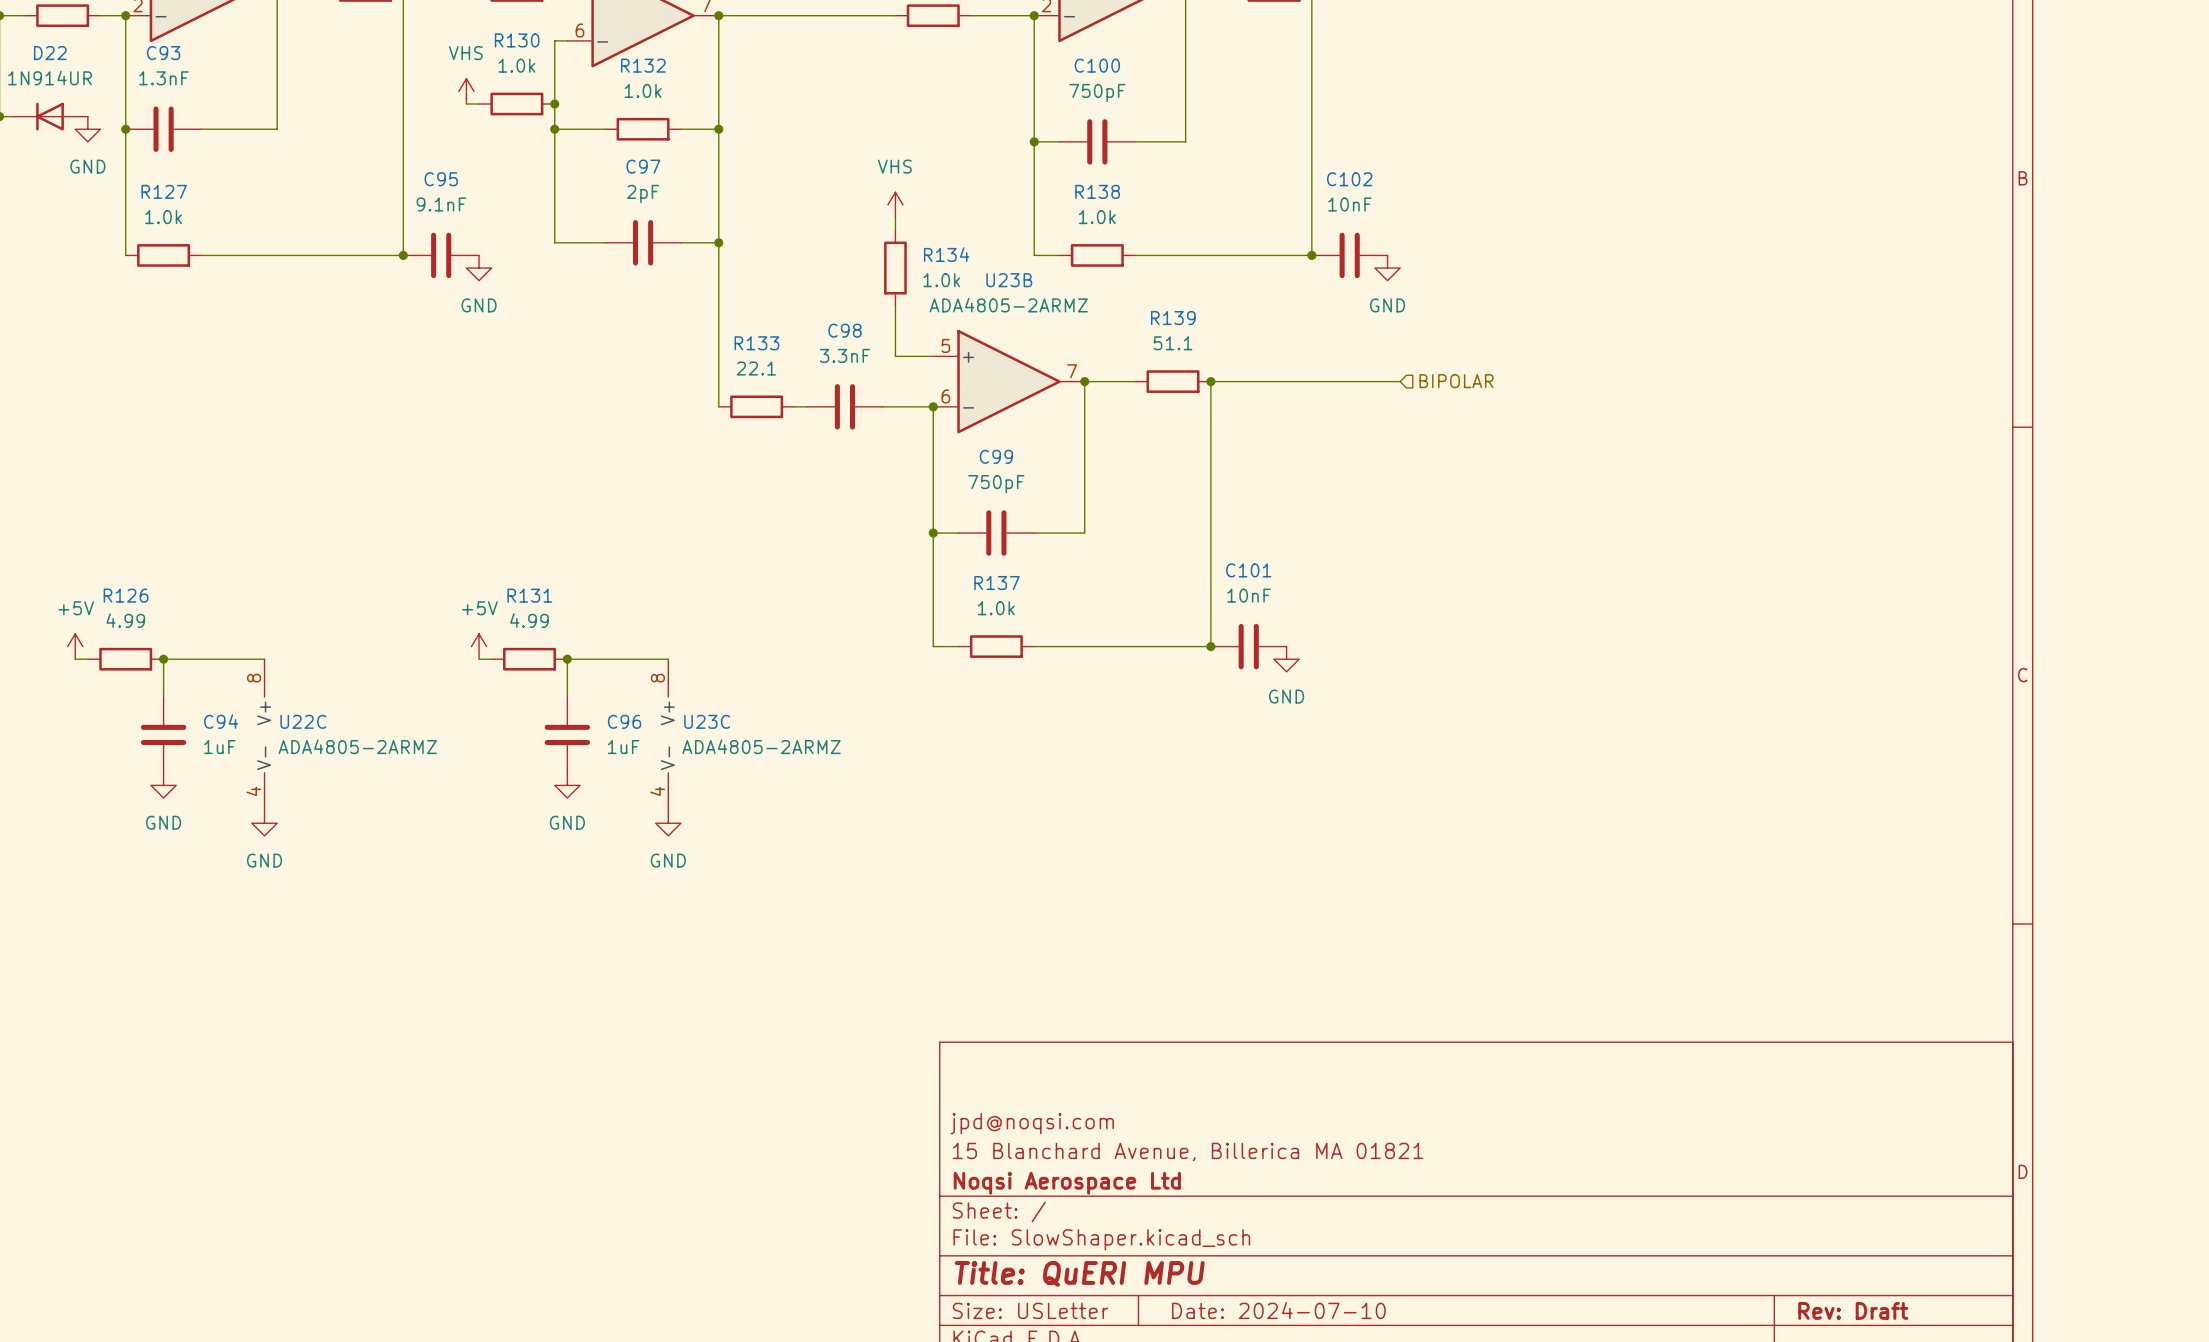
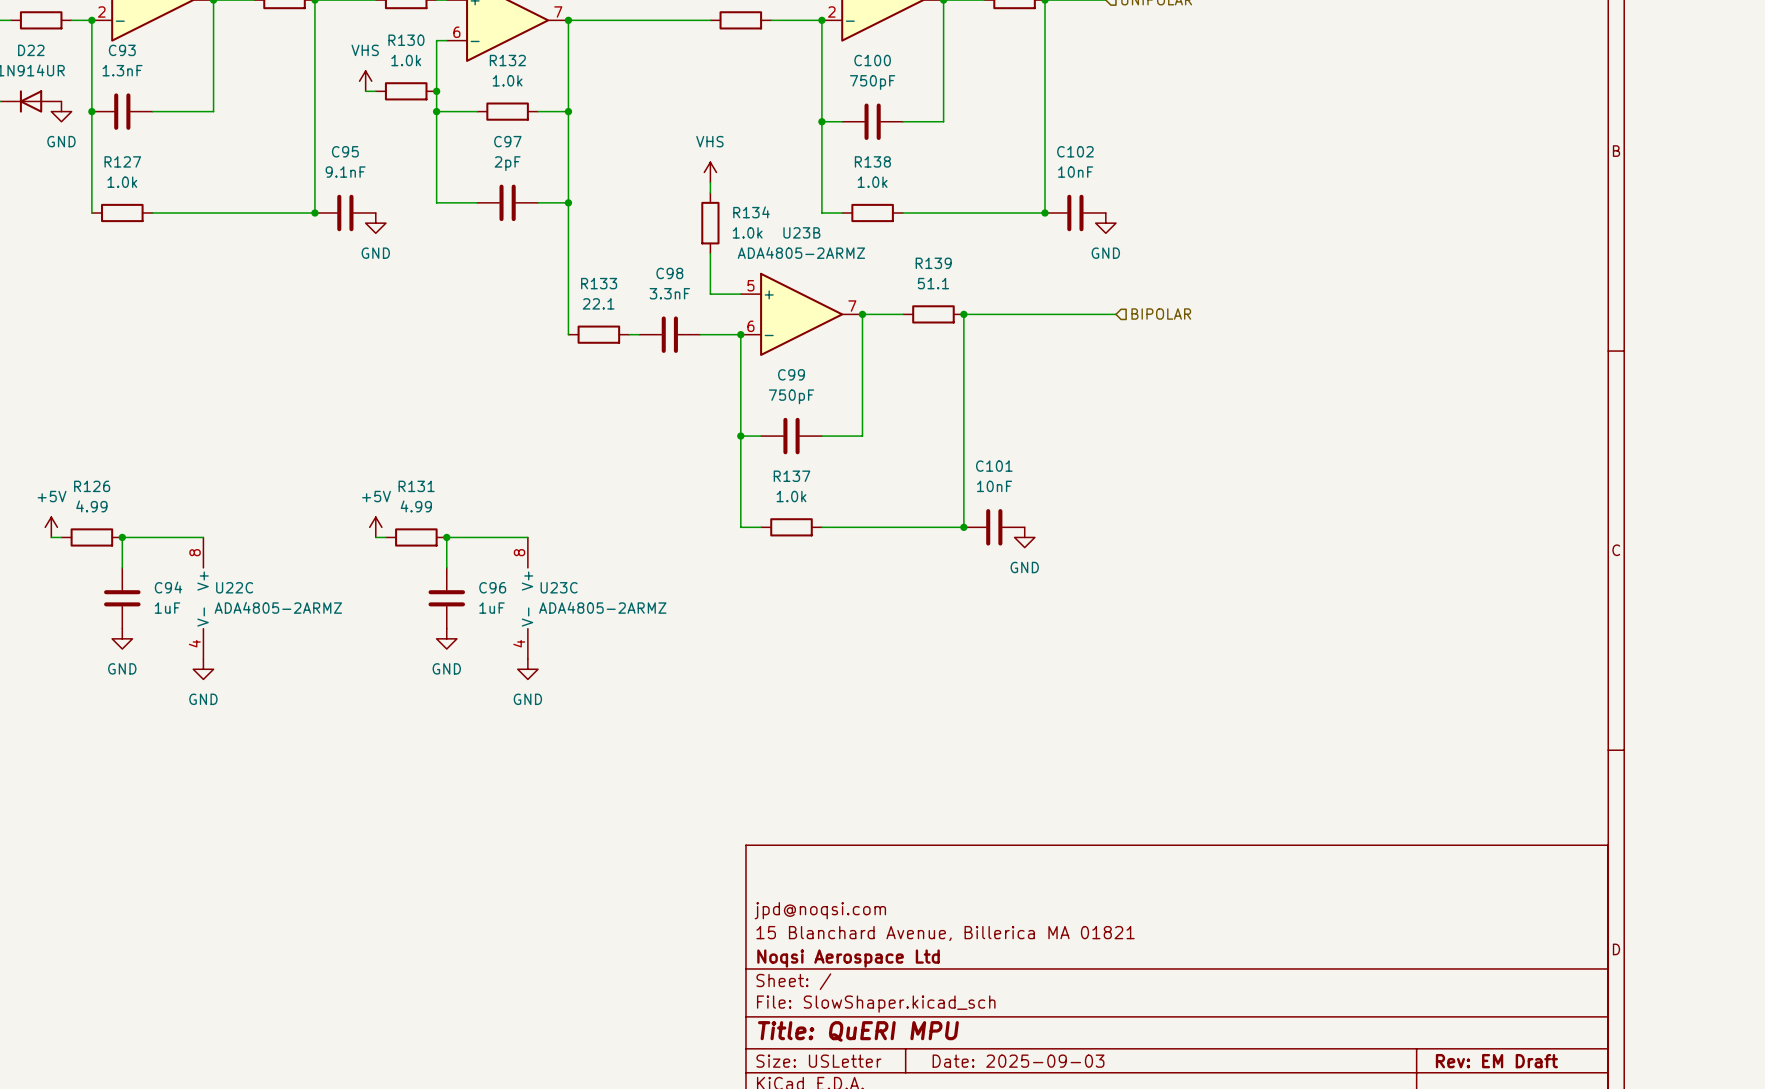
title block: Date: 2024-07-10 (1278, 1310) -> Date: 2025-09-03 (1018, 1061)
title block: Rev: Draft (1853, 1310) -> Rev: EM Draft (1496, 1061)

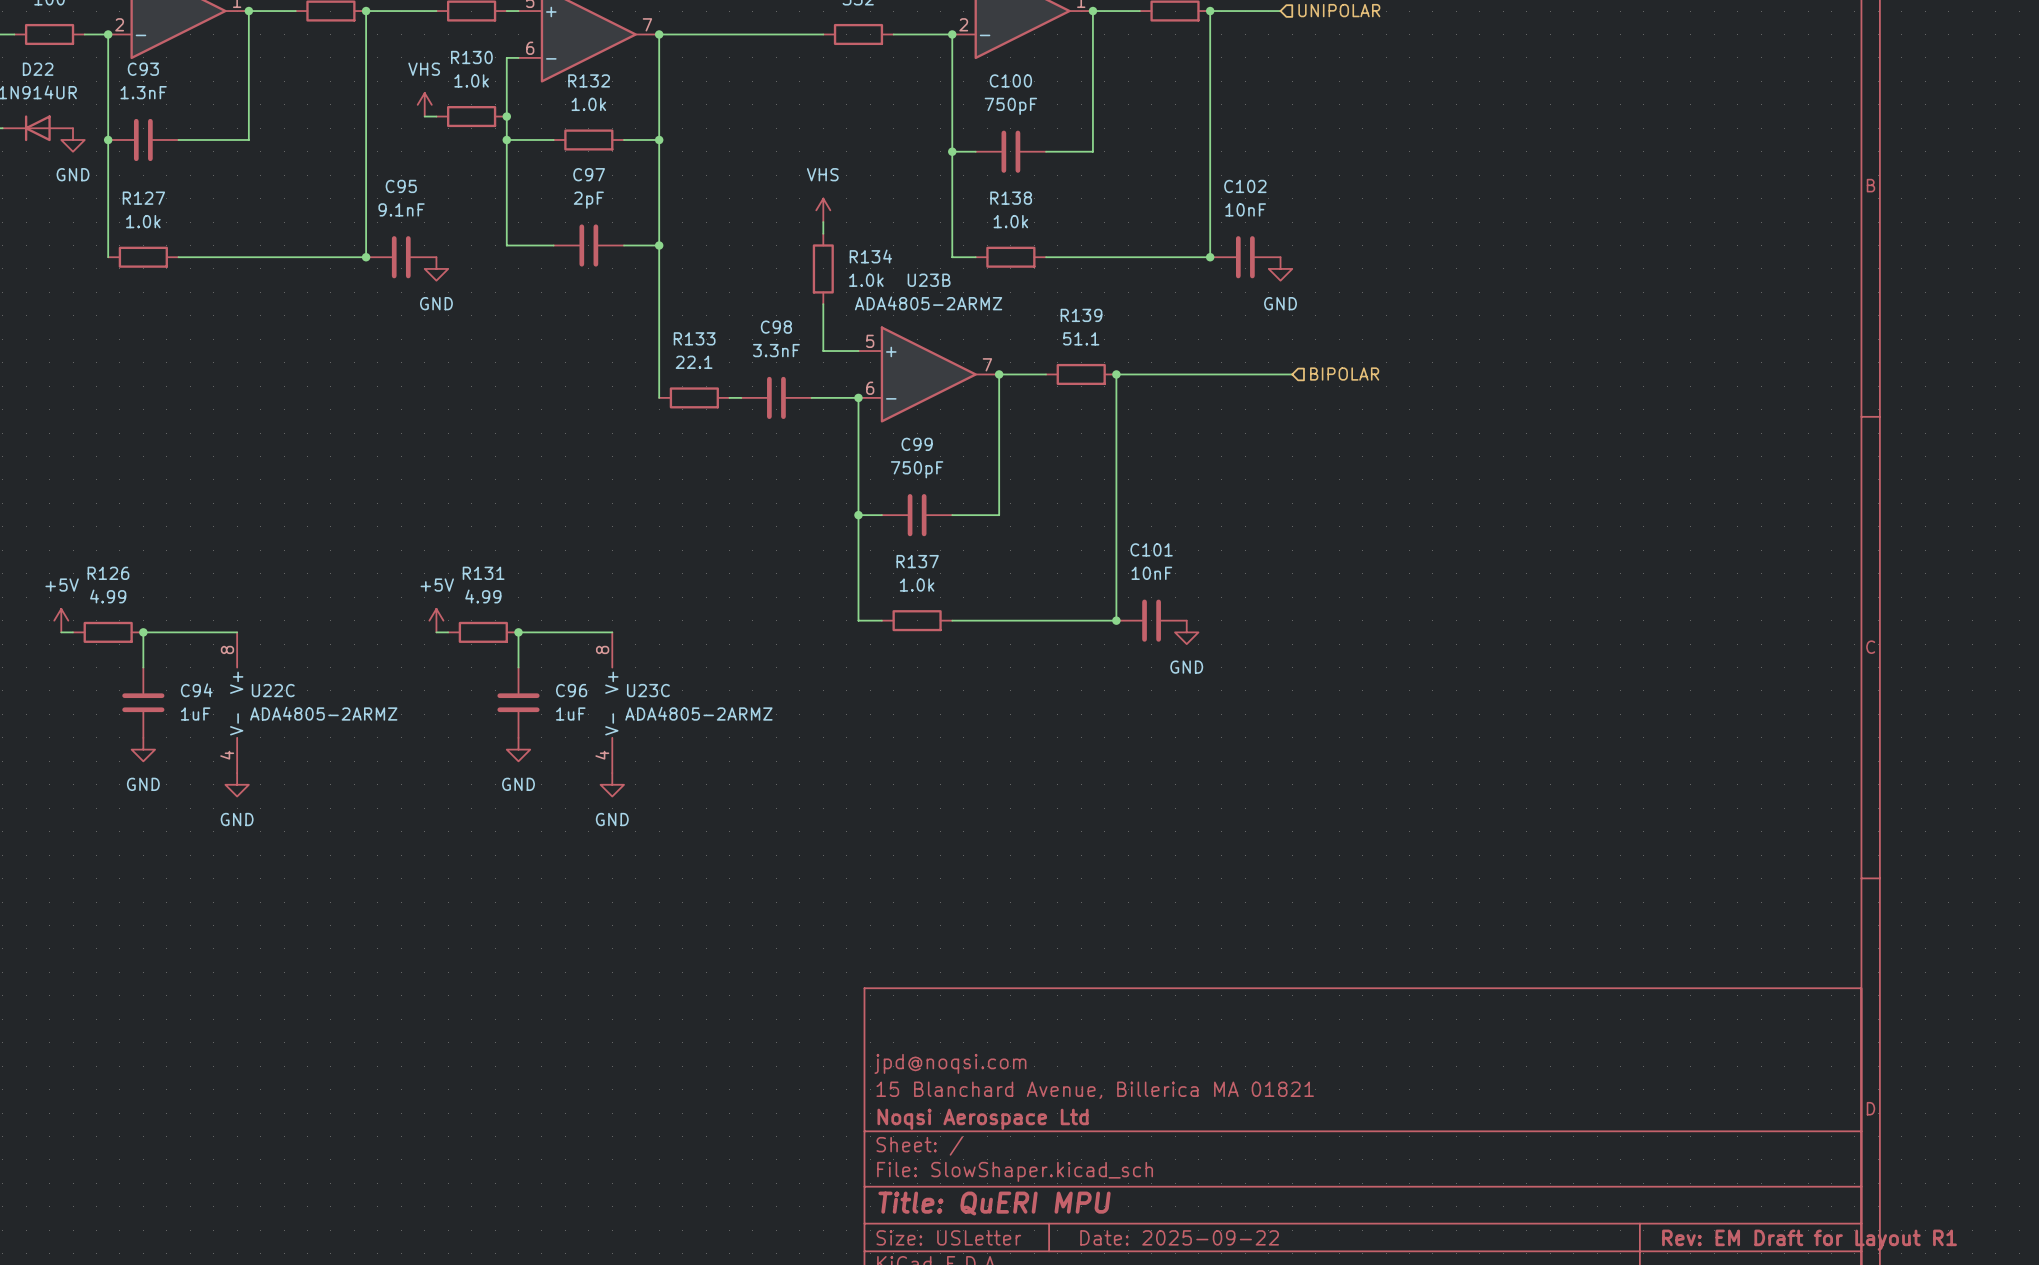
title block: Date: 2025-09-03 (1018, 1061) -> Date: 2025-09-22 (1179, 1237)
title block: Rev: EM Draft (1496, 1061) -> Rev: EM Draft for Layout R1 (1809, 1240)

